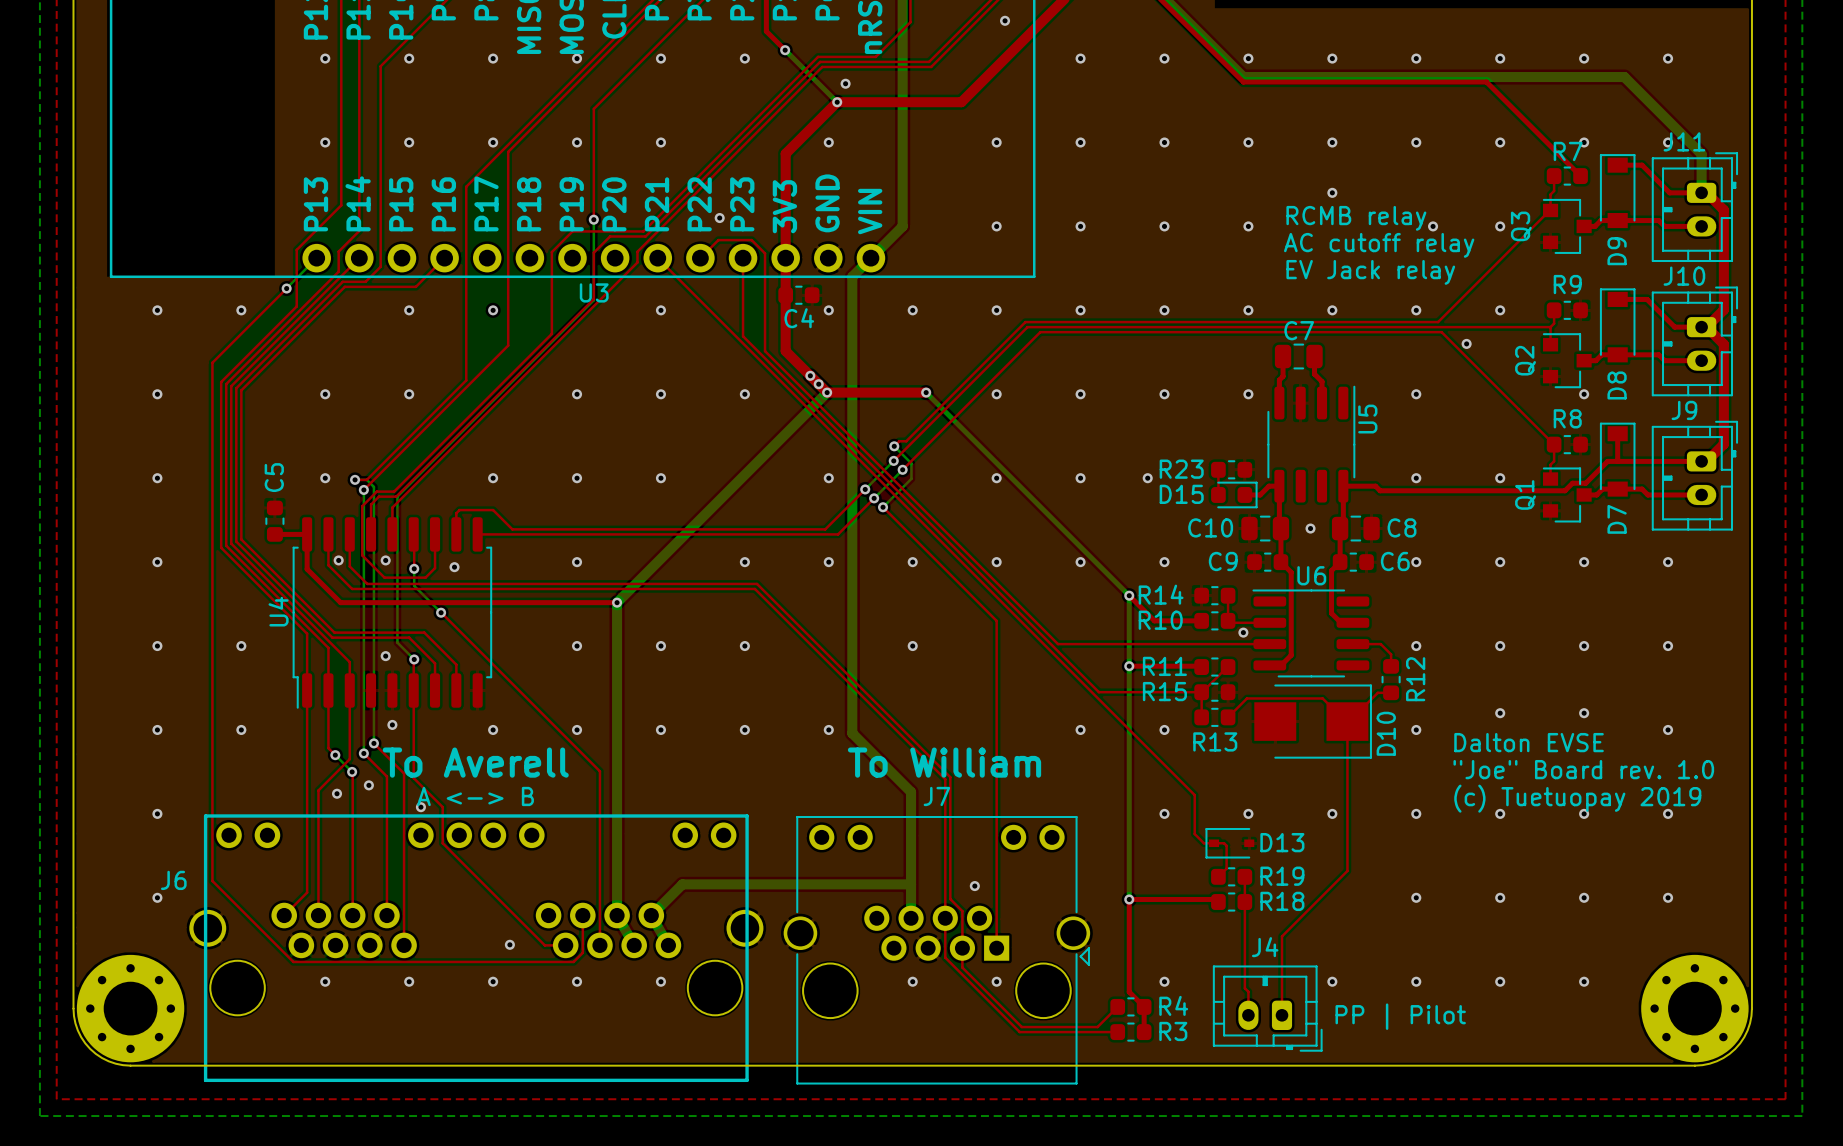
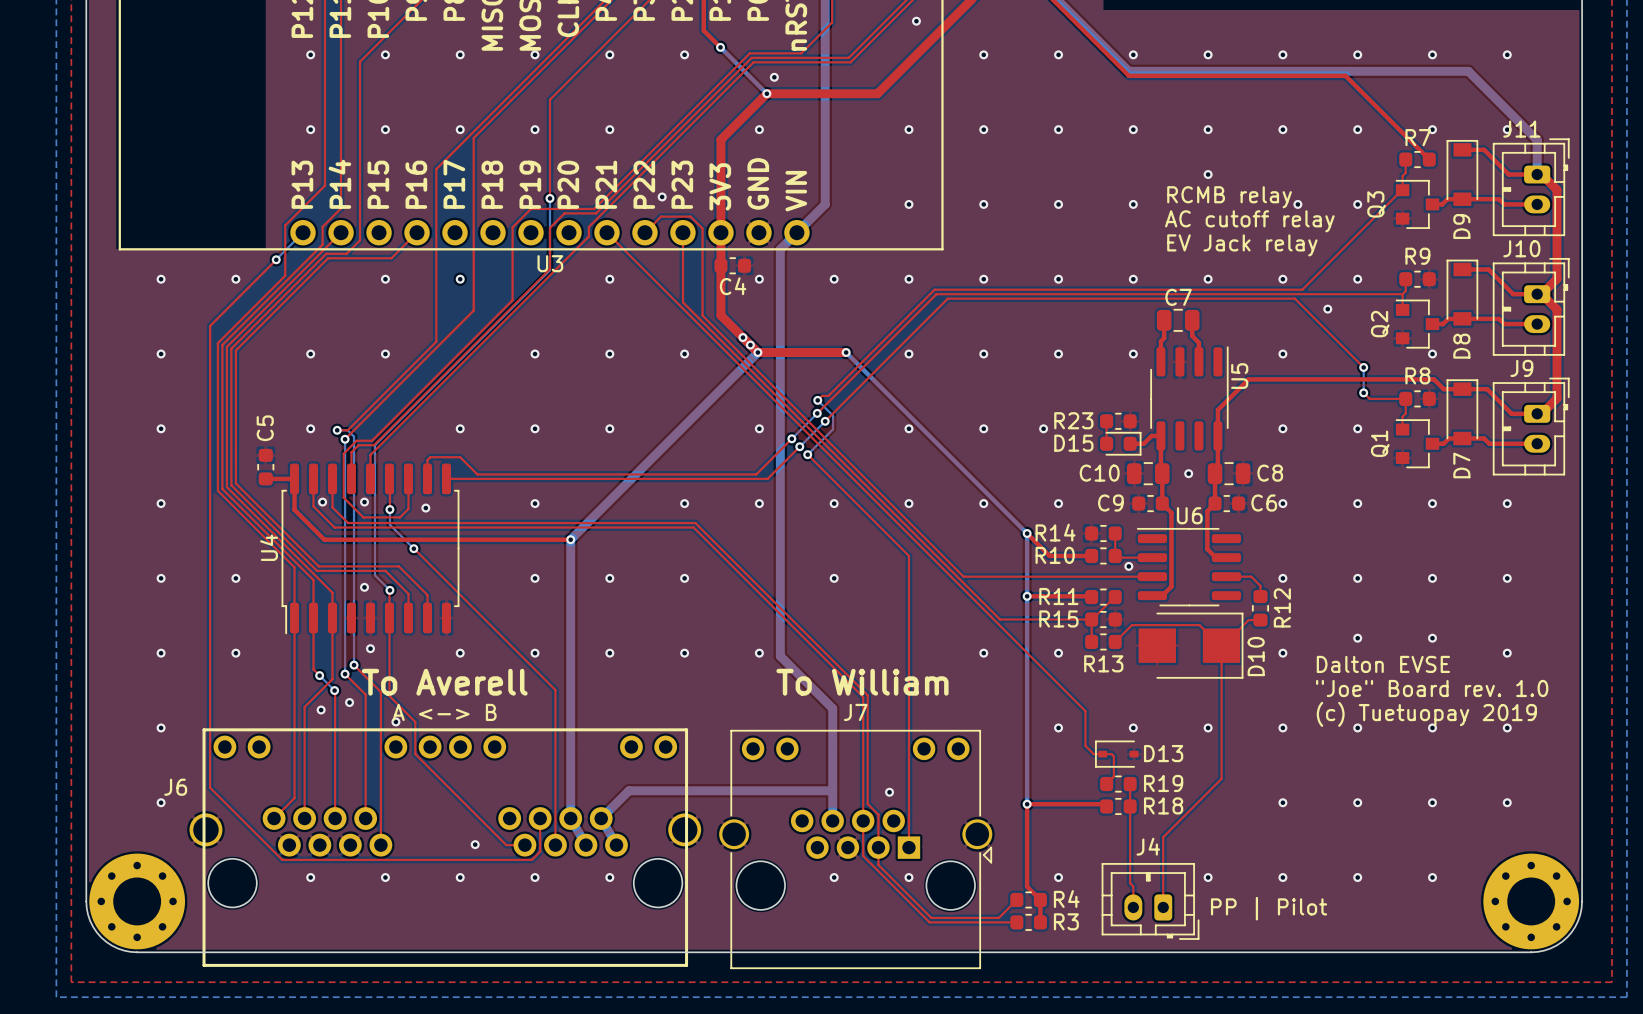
top track: (1429, 332) (1441, 332) (1554, 444) -> (1294, 298) (1363, 367)
bottom track: none -> (1363, 367) (1363, 392)
via: none -> (1363, 367)
top track: (1617, 433) (1617, 461) -> none
top track: none -> (1363, 392) (1369, 398) (1405, 398)
via: none -> (1363, 392)
top track: (1673, 461) (1607, 461) (1585, 483) (1572, 483) (1564, 490) (1380, 490) (1375, 486) (1343, 486) -> (1511, 413) (1487, 389) (1443, 389) (1433, 379) (1248, 379) (1217, 410) (1217, 435)

